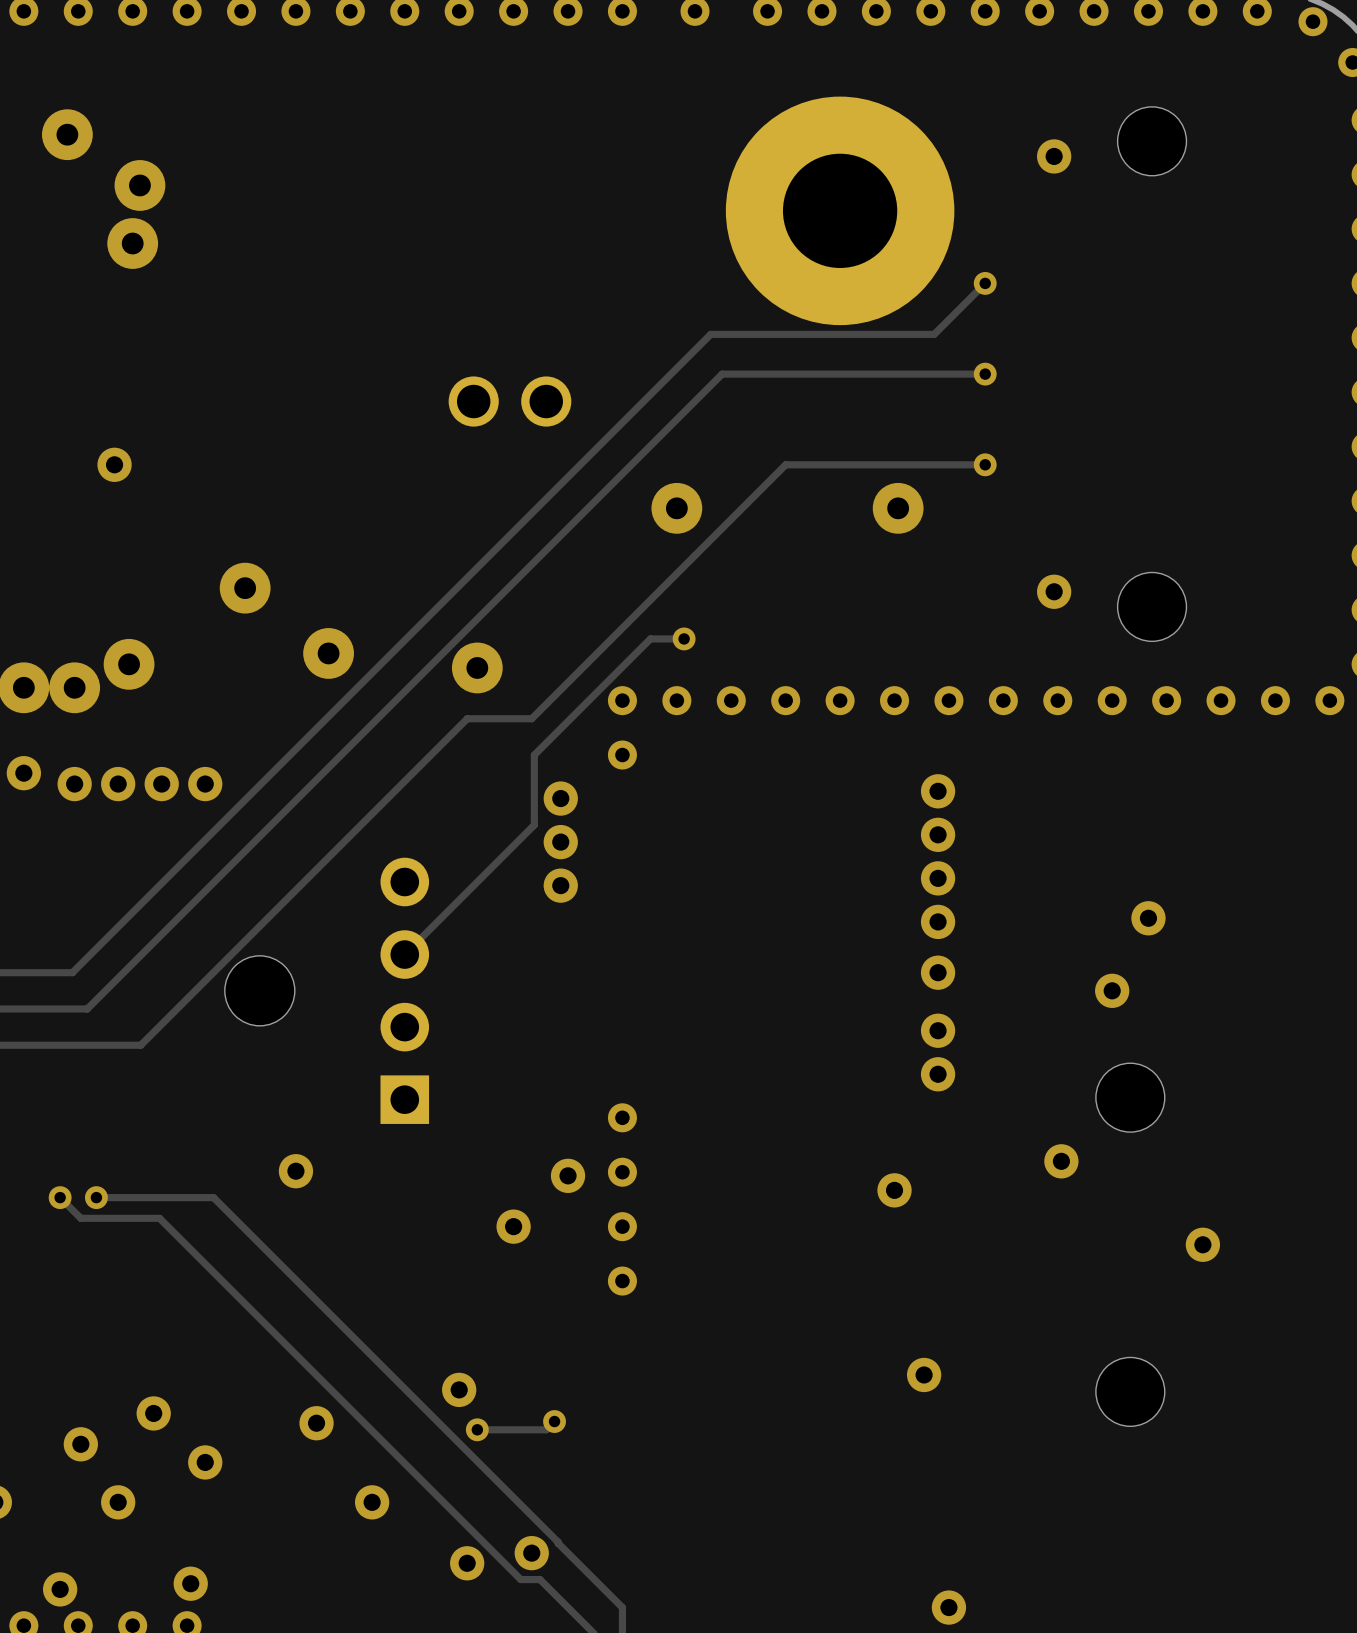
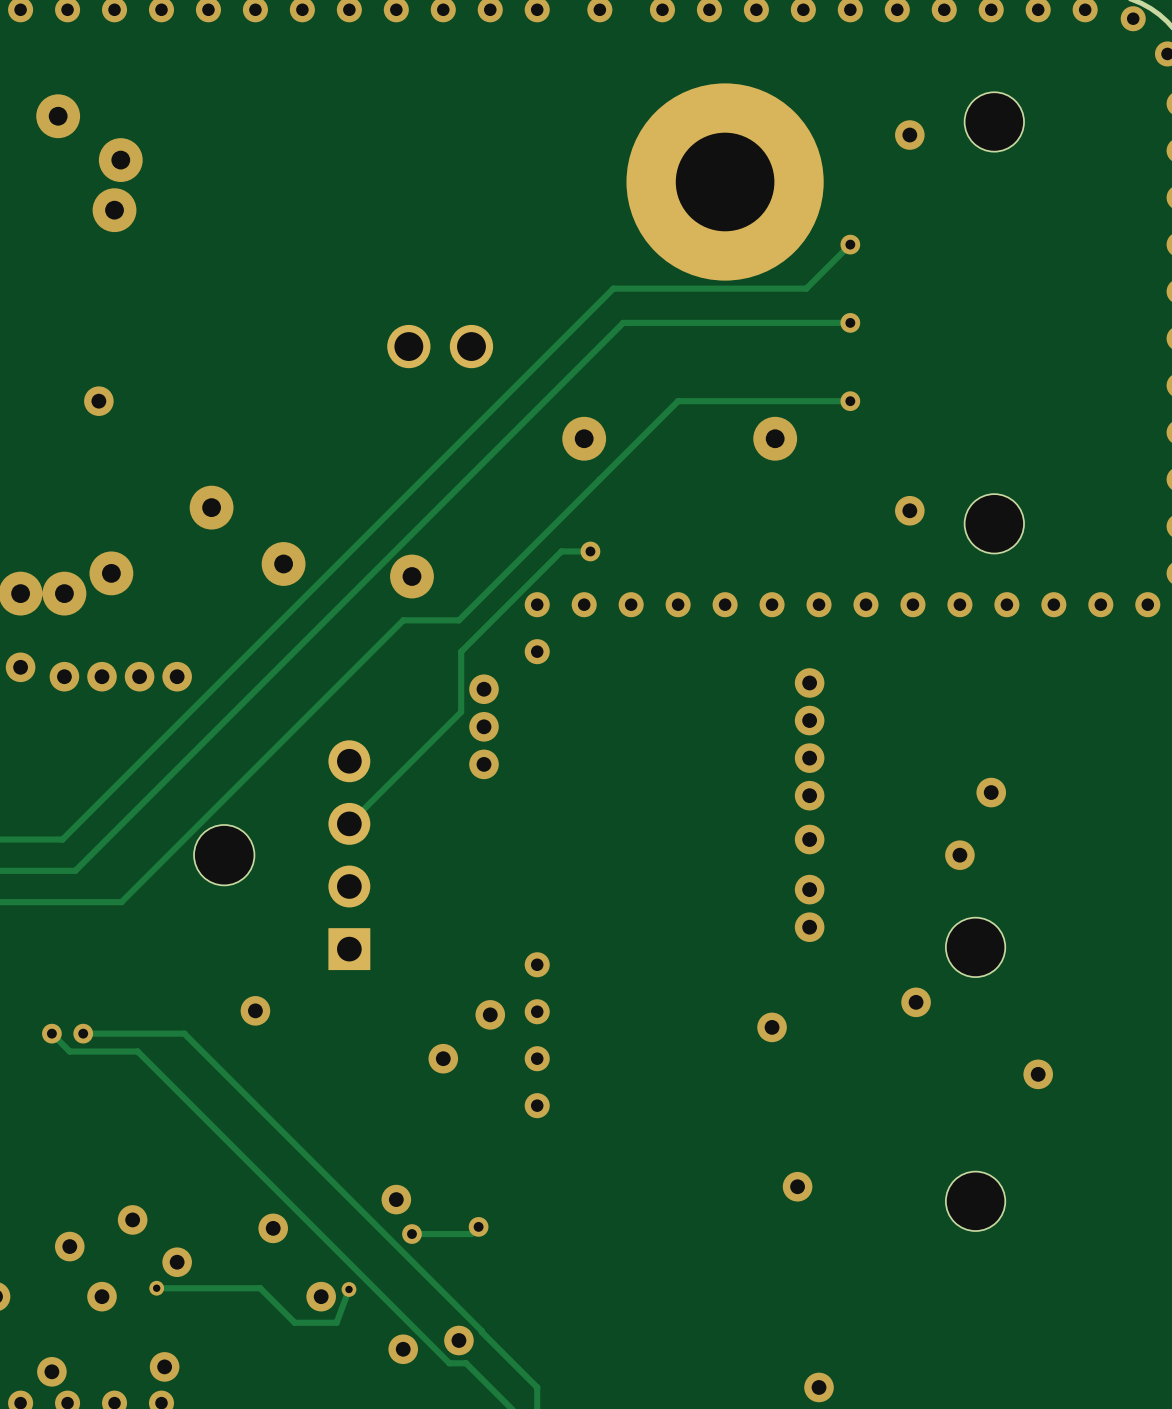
track: none -> (156, 1288) (260, 1288) (294, 1322) (336, 1322) (348, 1289)
via: none -> (156, 1288)
via: none -> (348, 1289)

